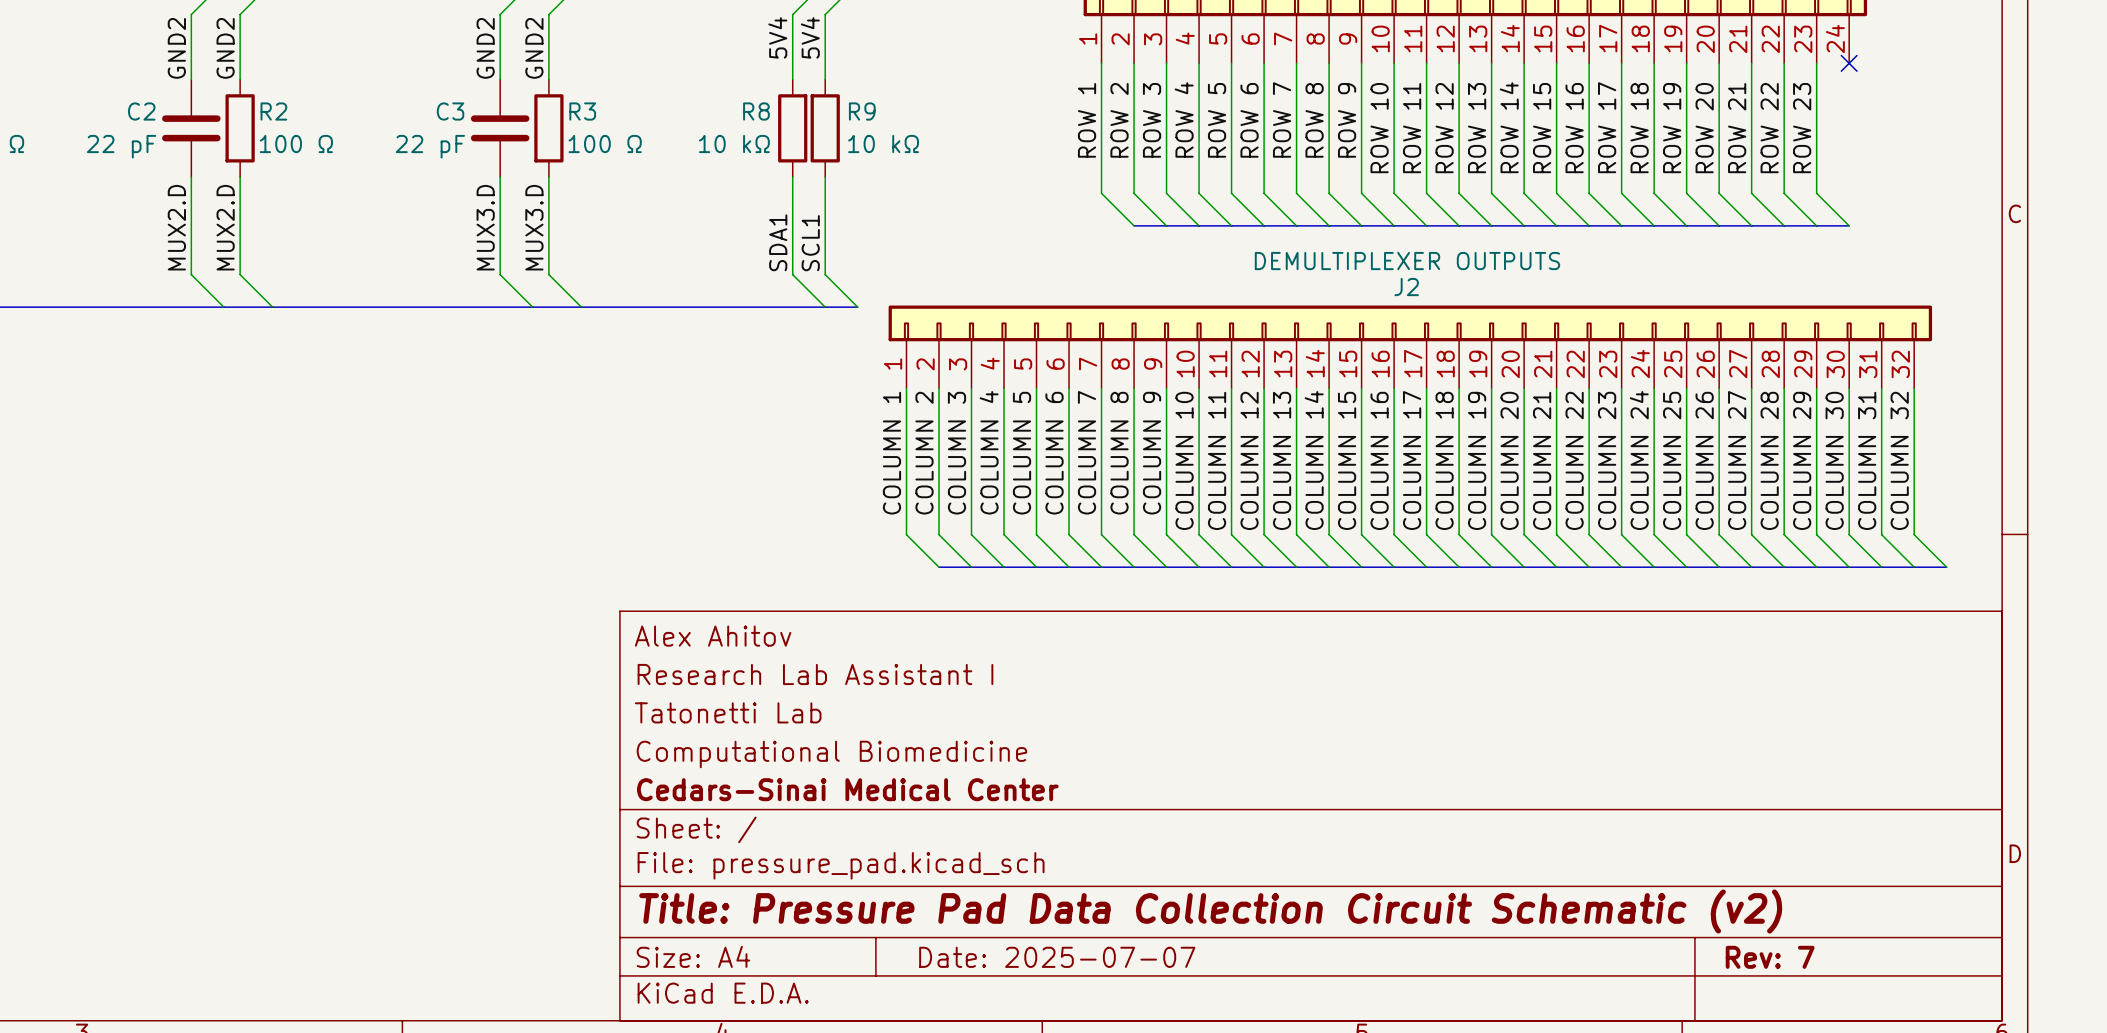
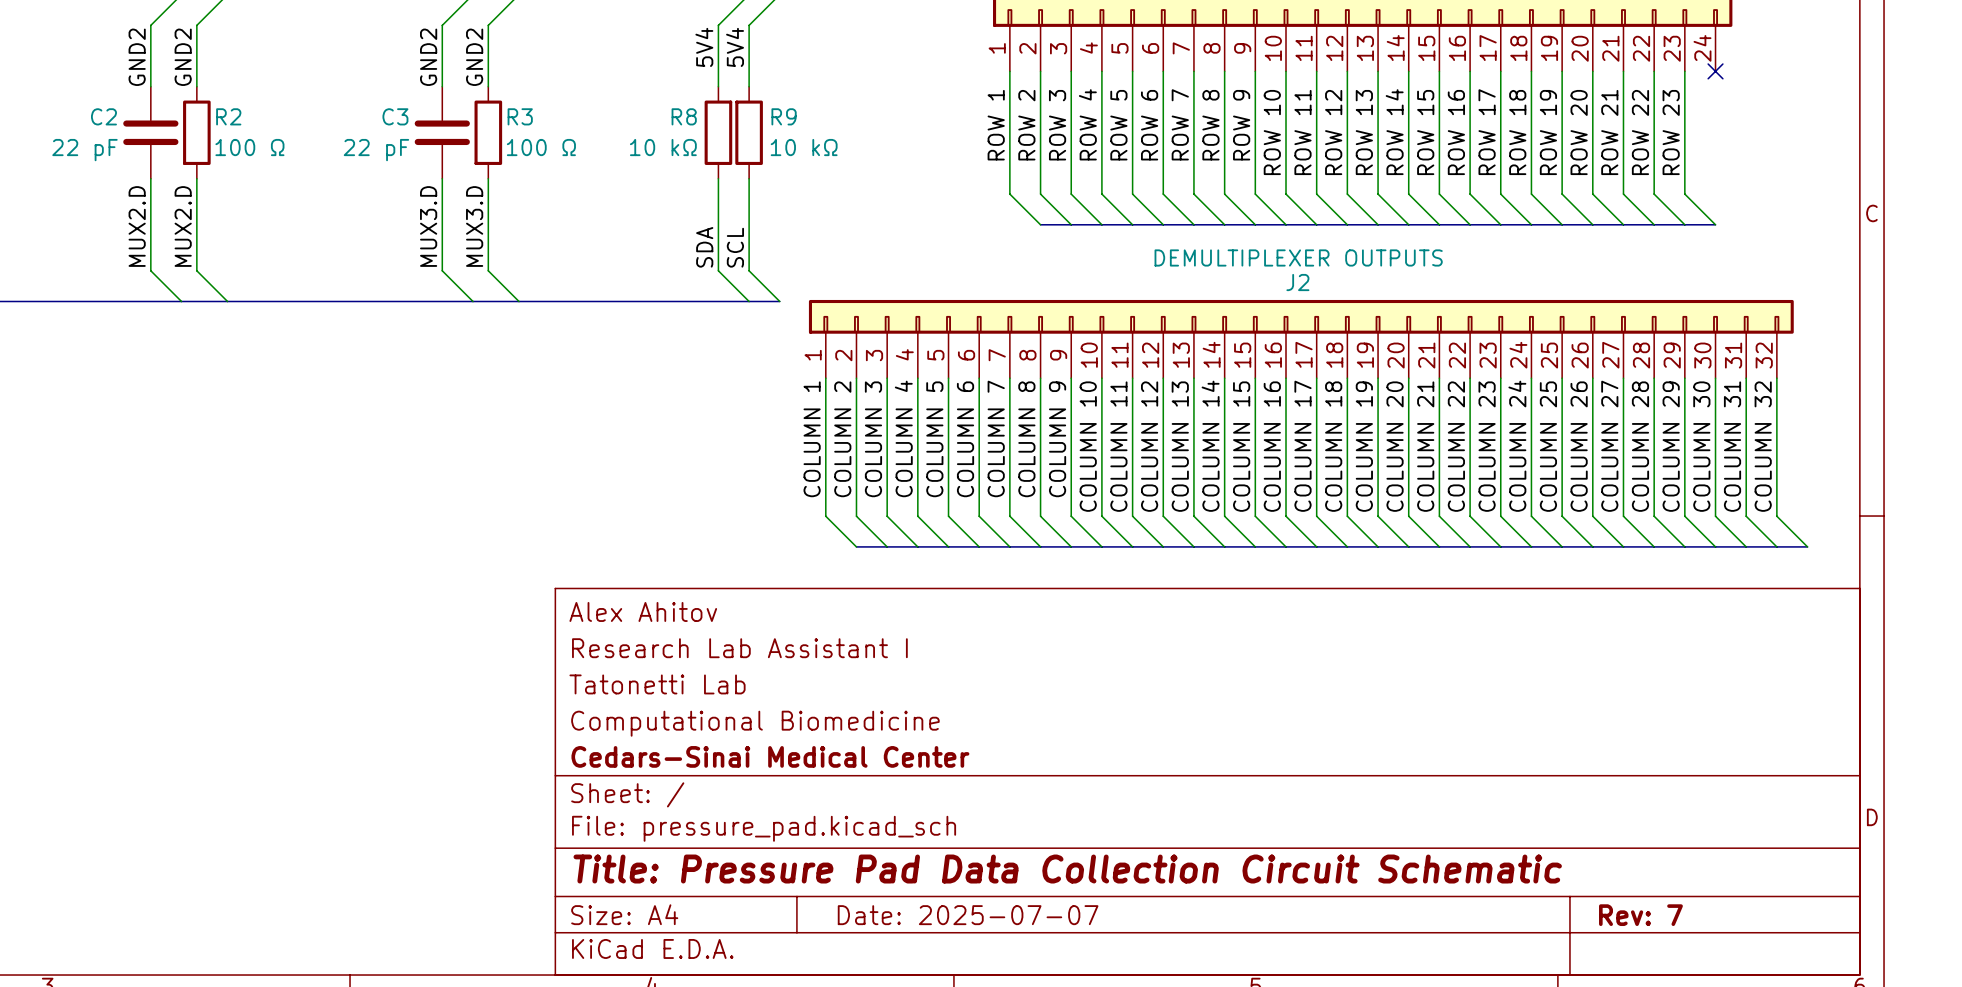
label: SDA1 (778, 242) -> SDA (704, 247)
label: SCL1 (810, 243) -> SCL (735, 247)
title block: Title: Pressure Pad Data Collection Circuit Schematic (v2) (1210, 911) -> Title: Pressure Pad Data Collection Circuit Schematic (1067, 869)

